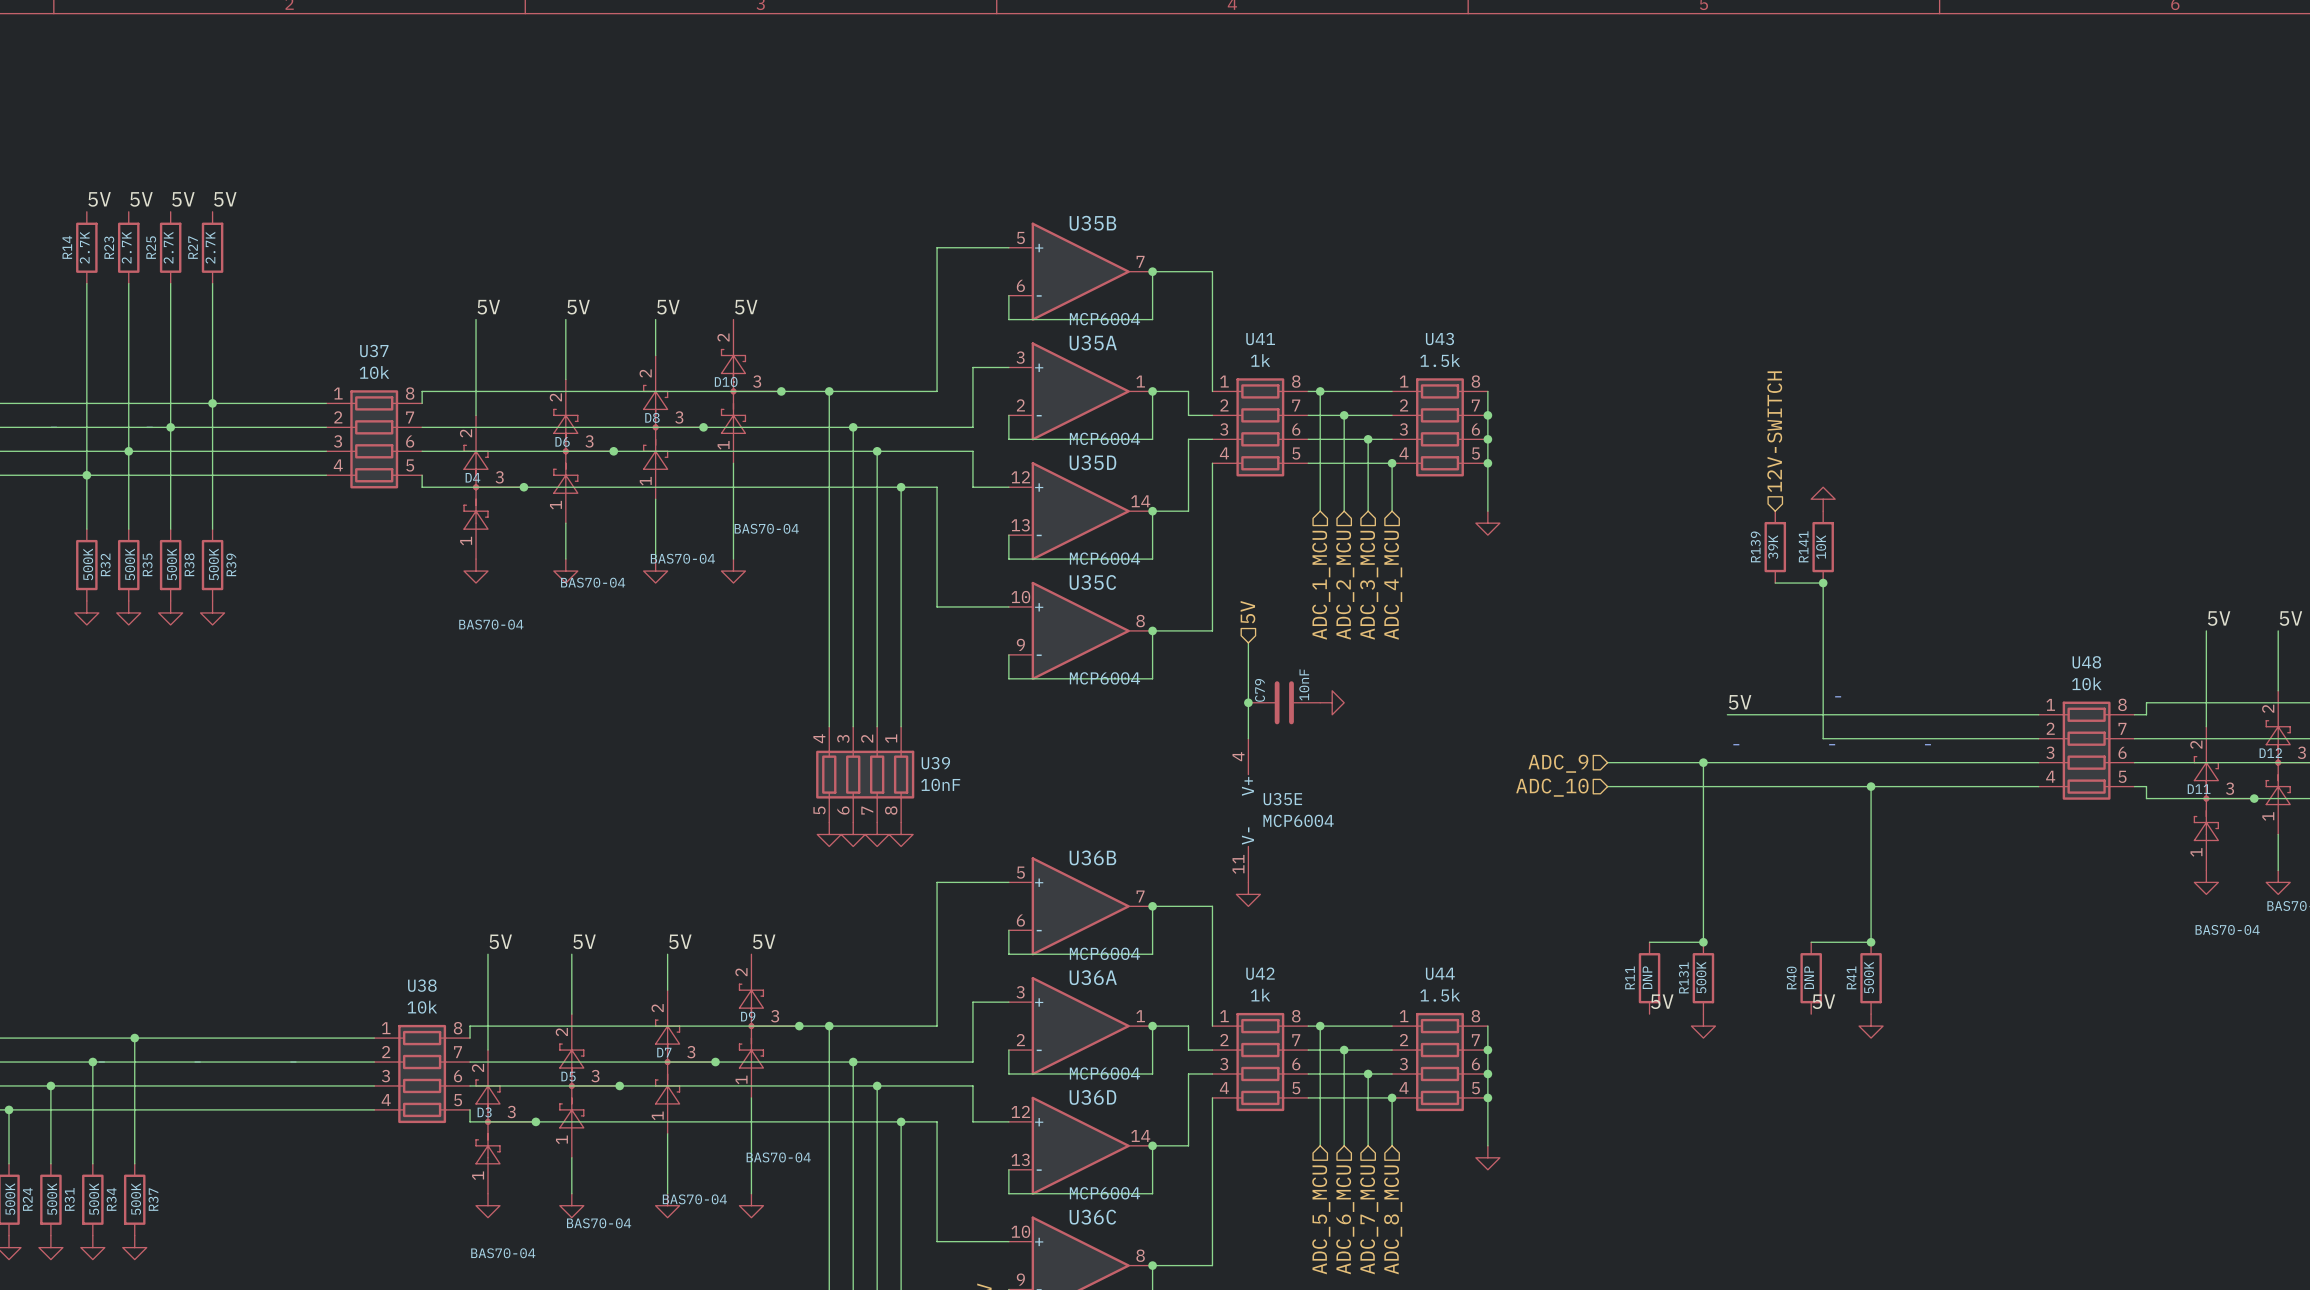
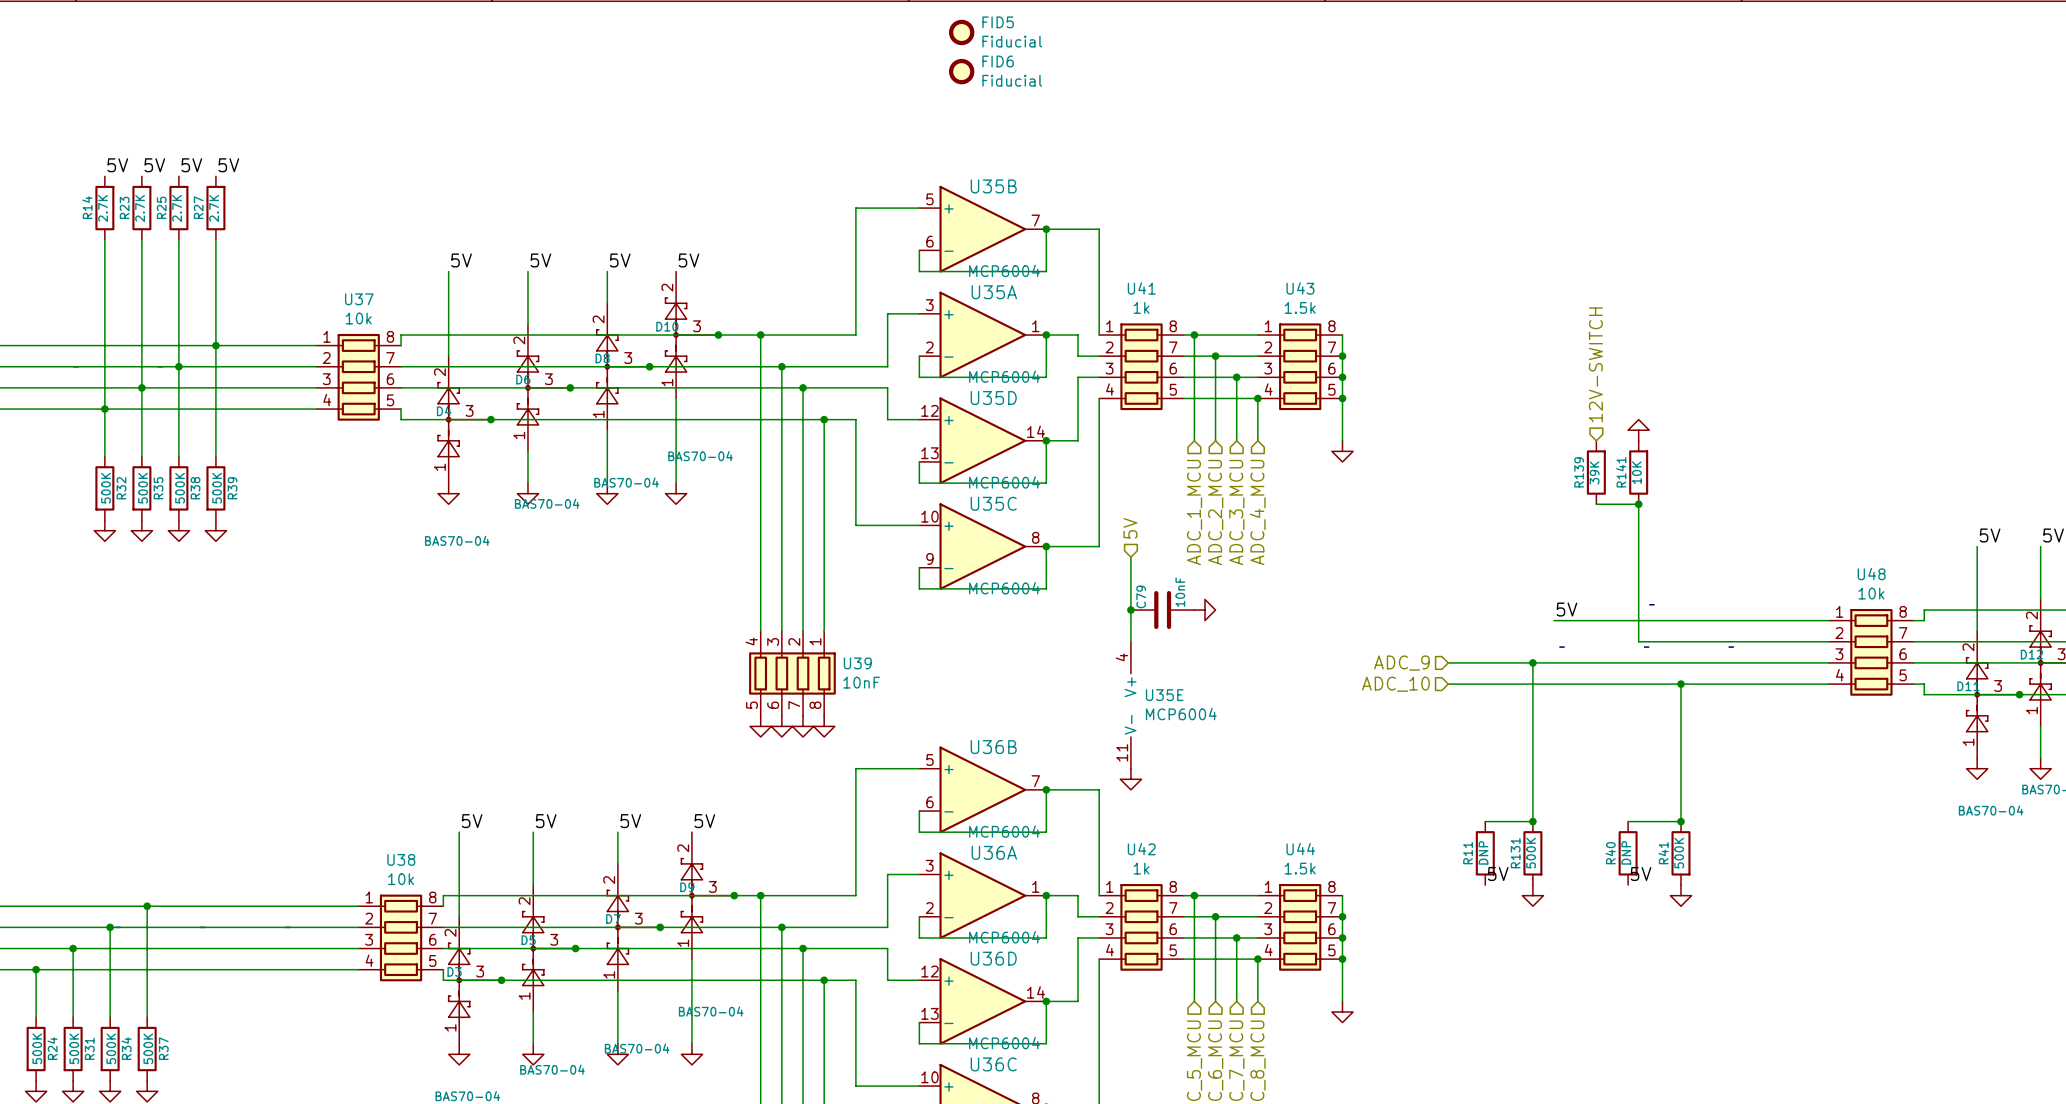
FID5: none -> Fiducial (961, 32)
FID6: none -> Fiducial (961, 71)

